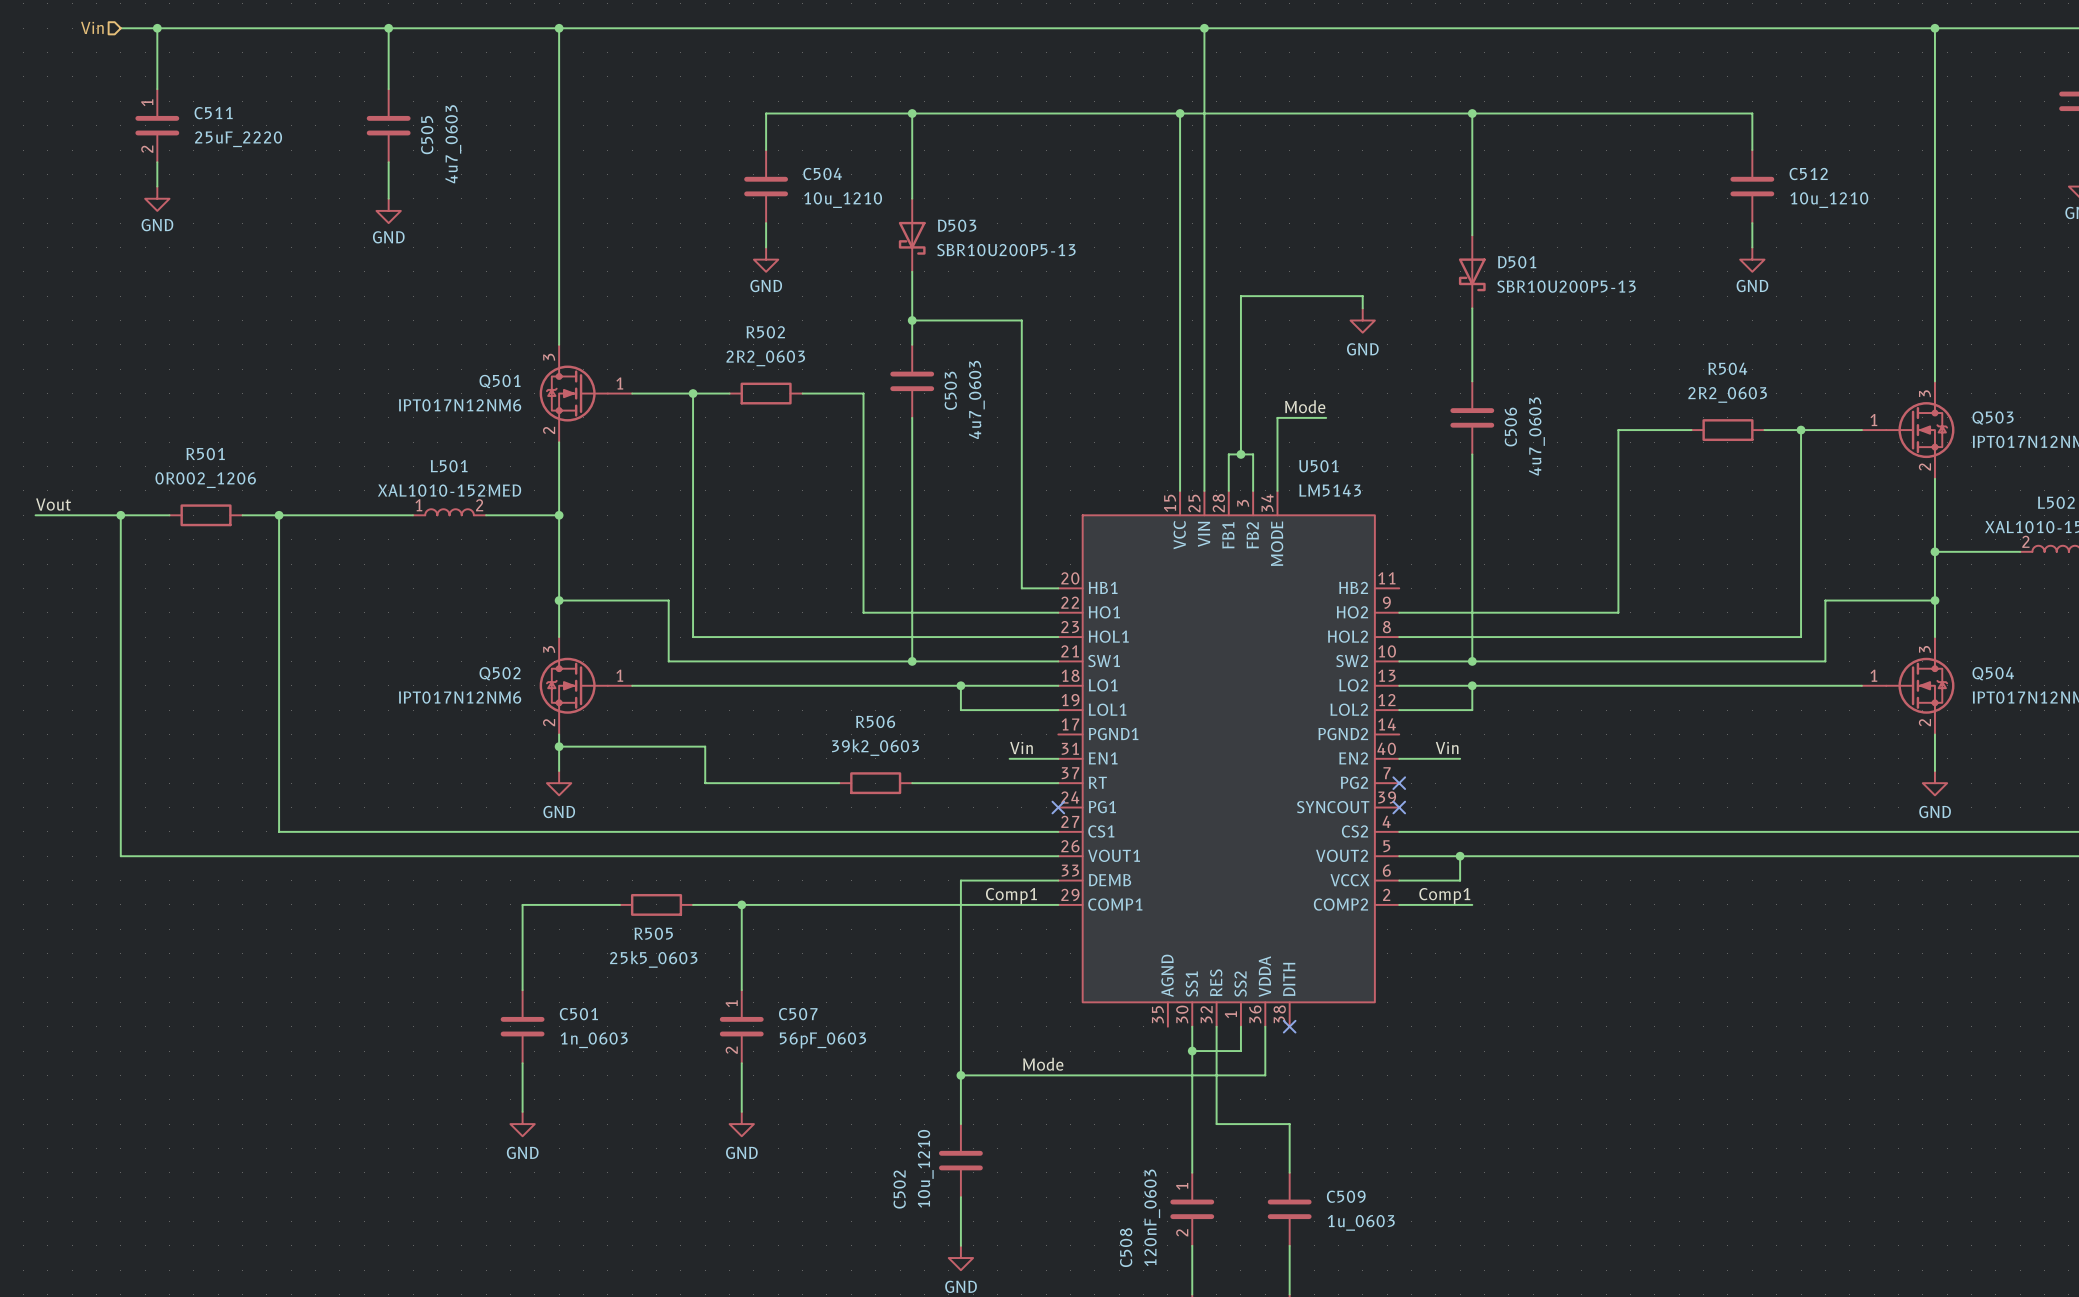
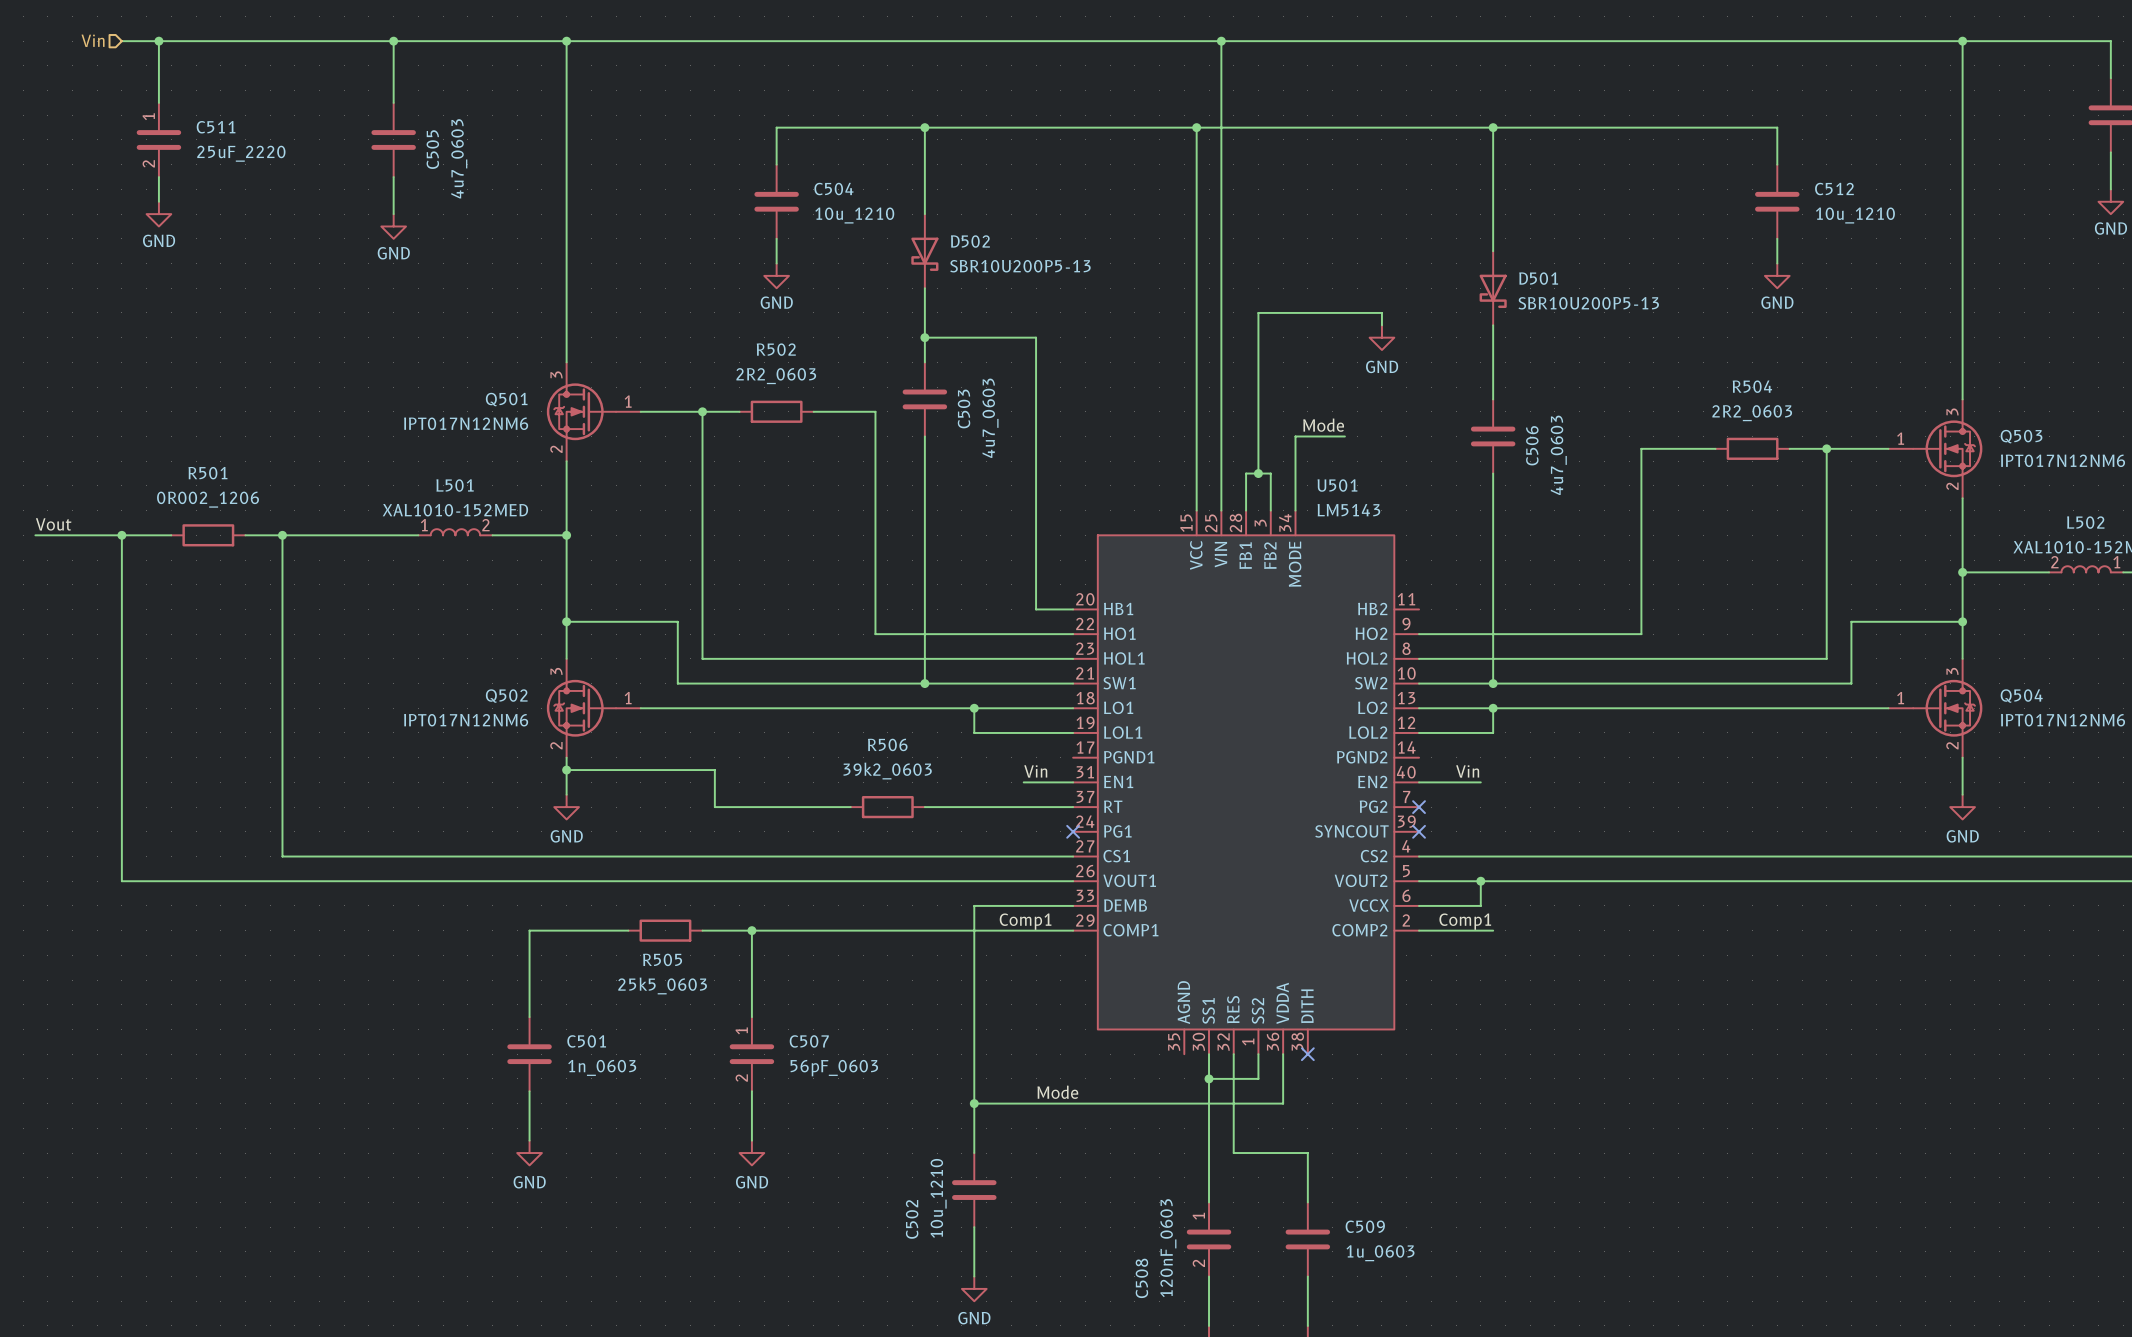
D503 name: D503 (957, 225) -> D502 (970, 241)

